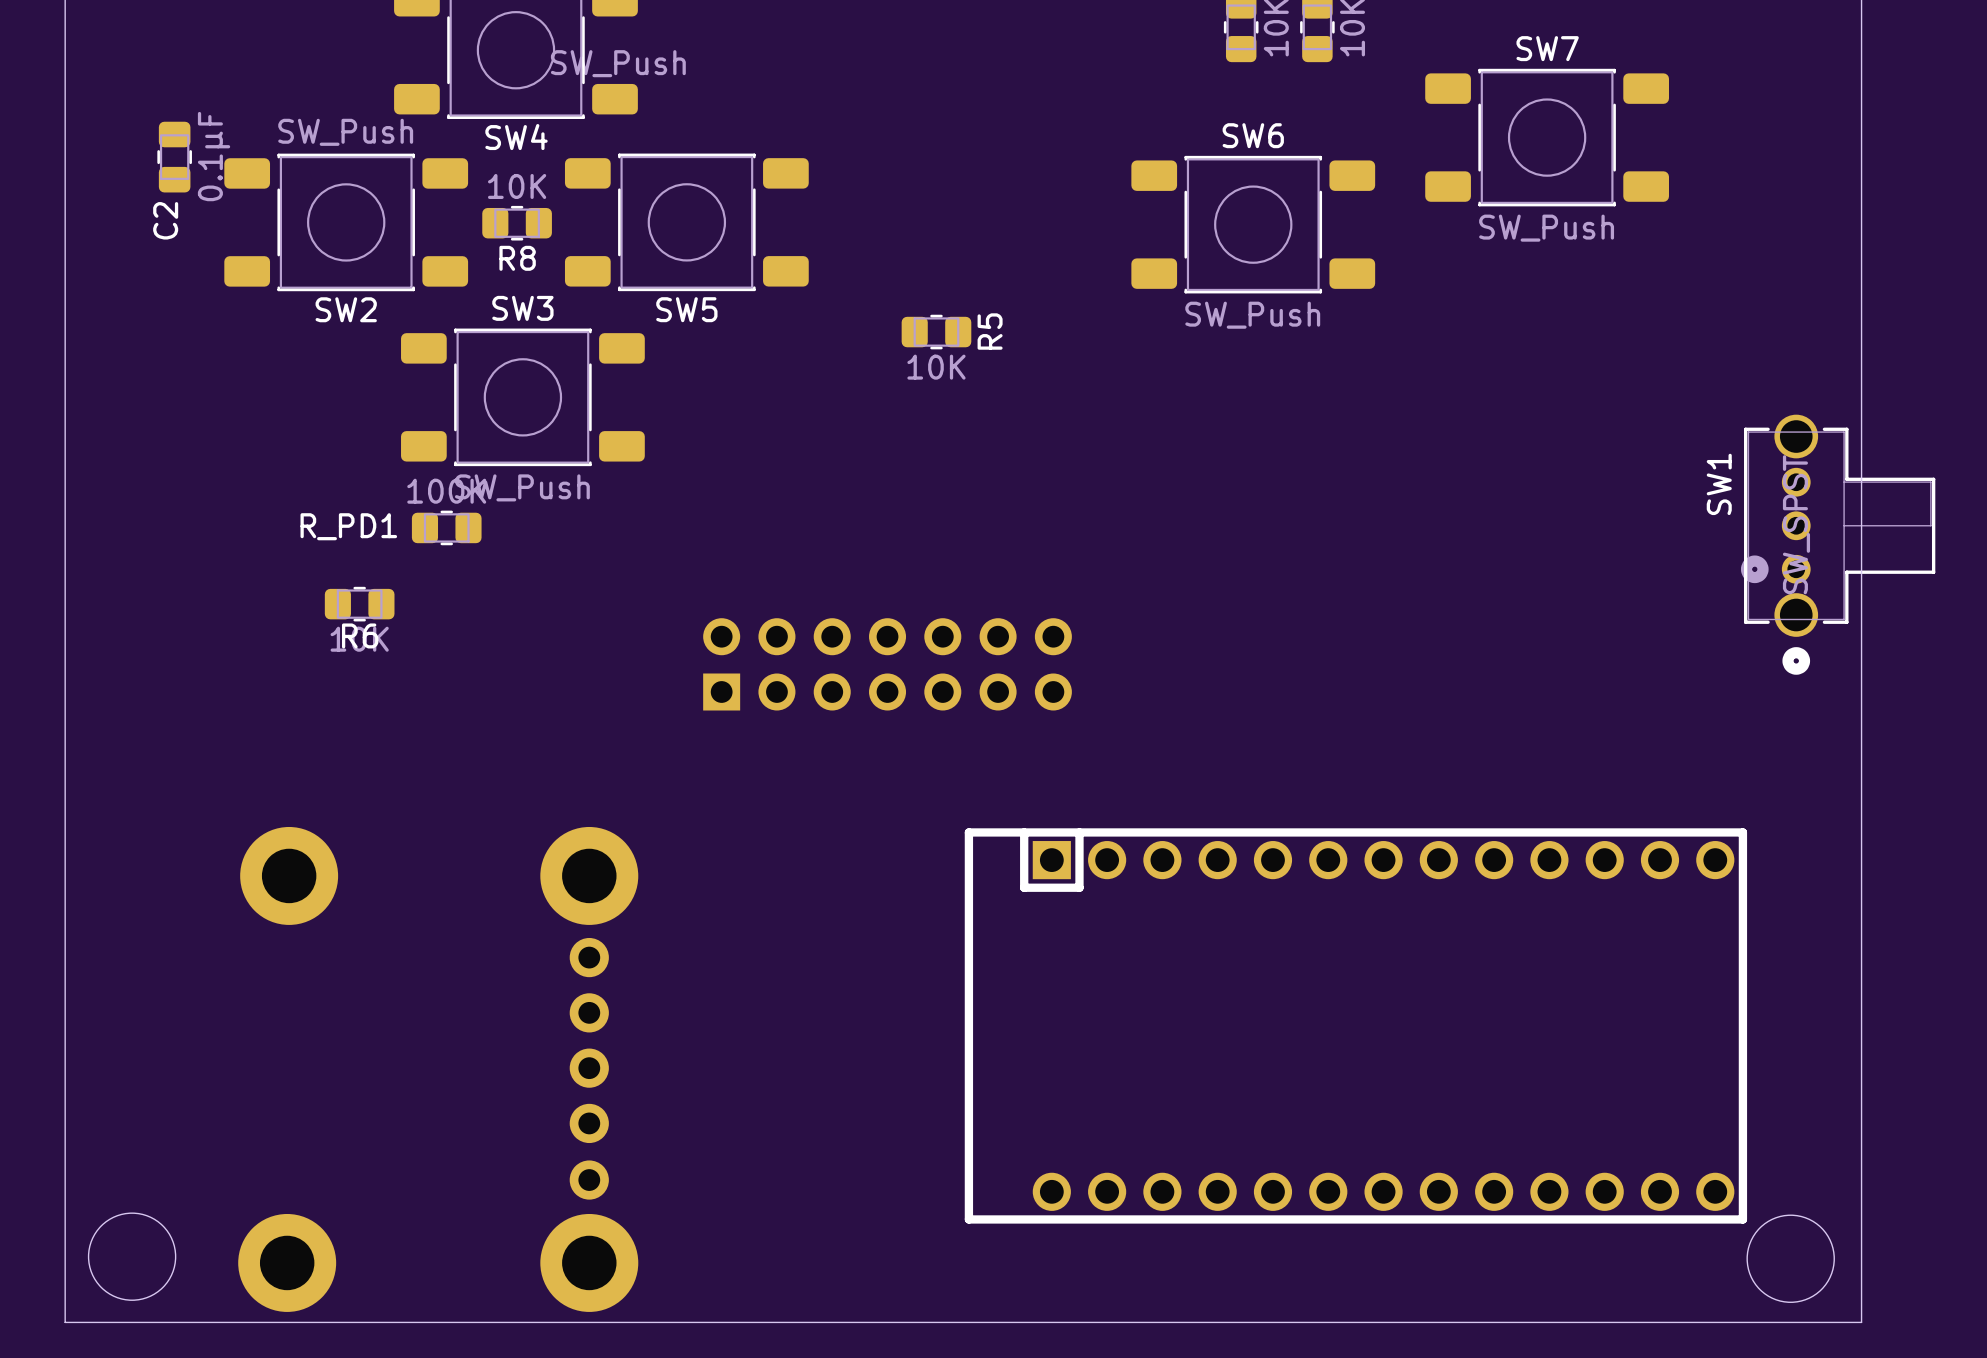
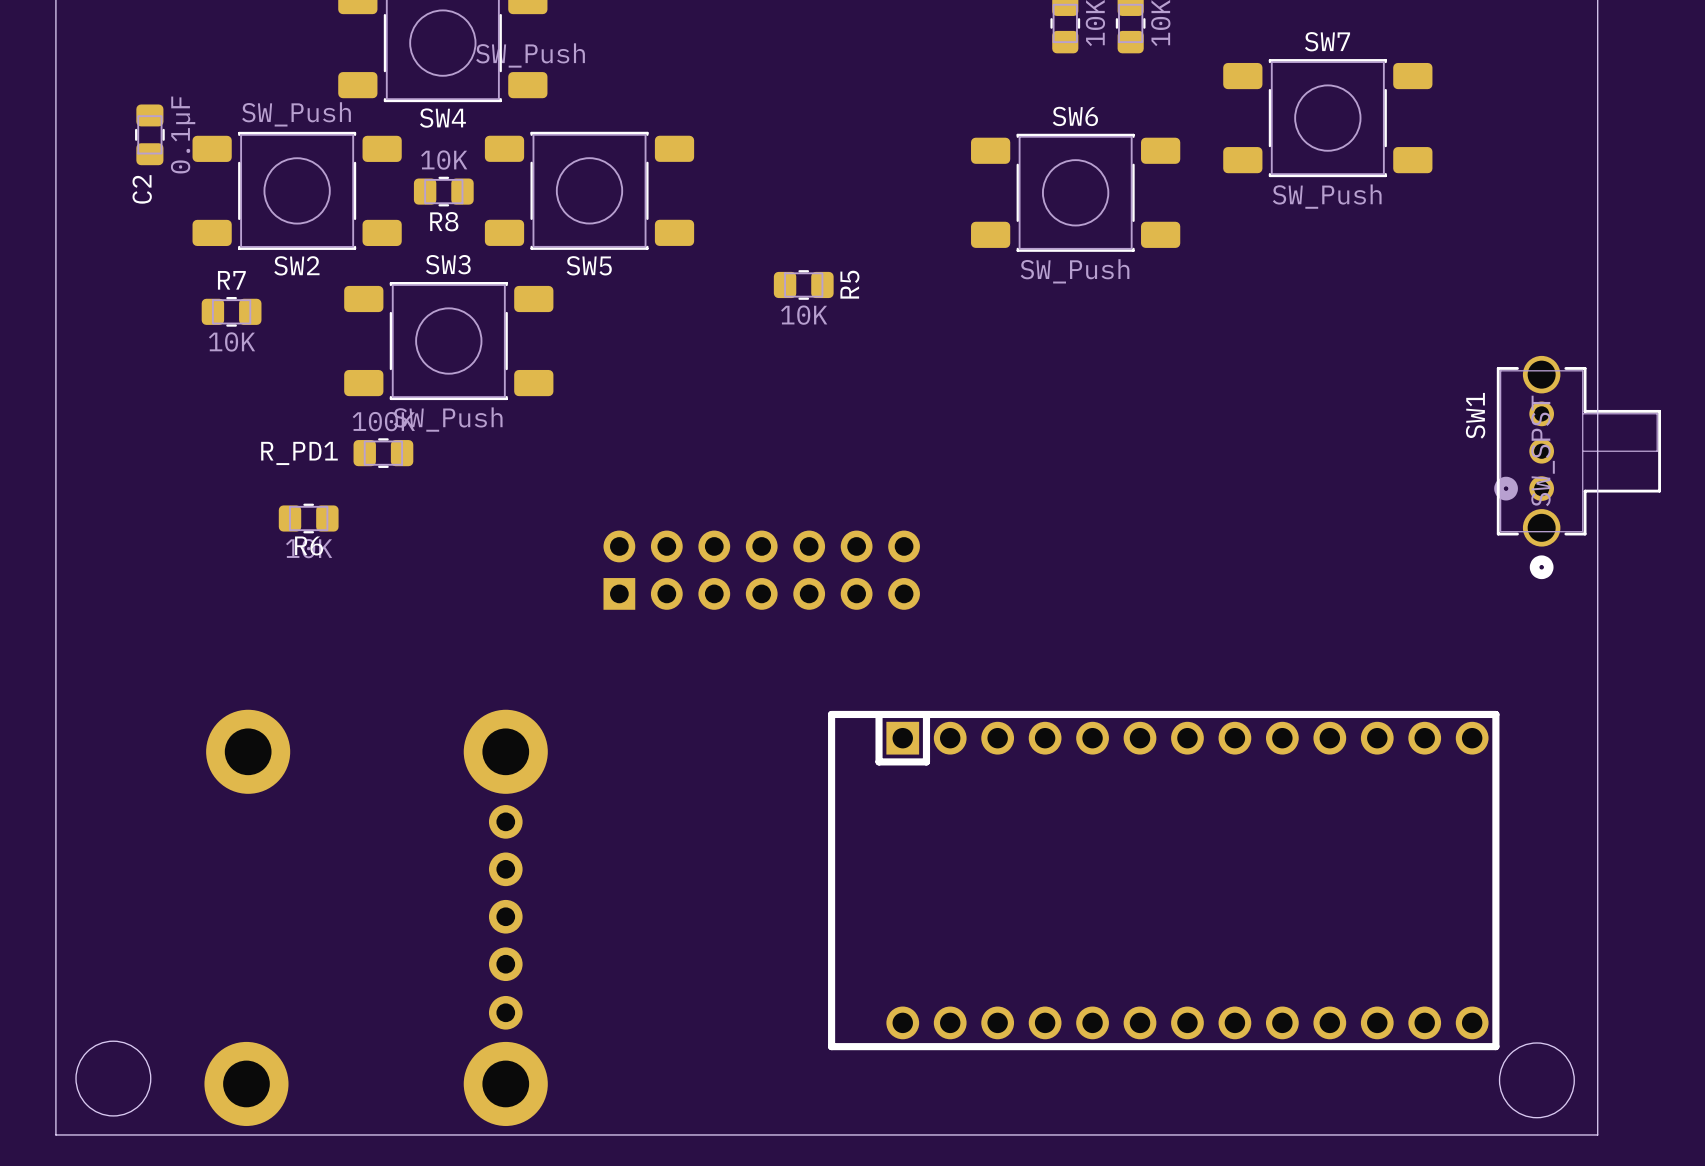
R7: none -> 10K (231, 311)

